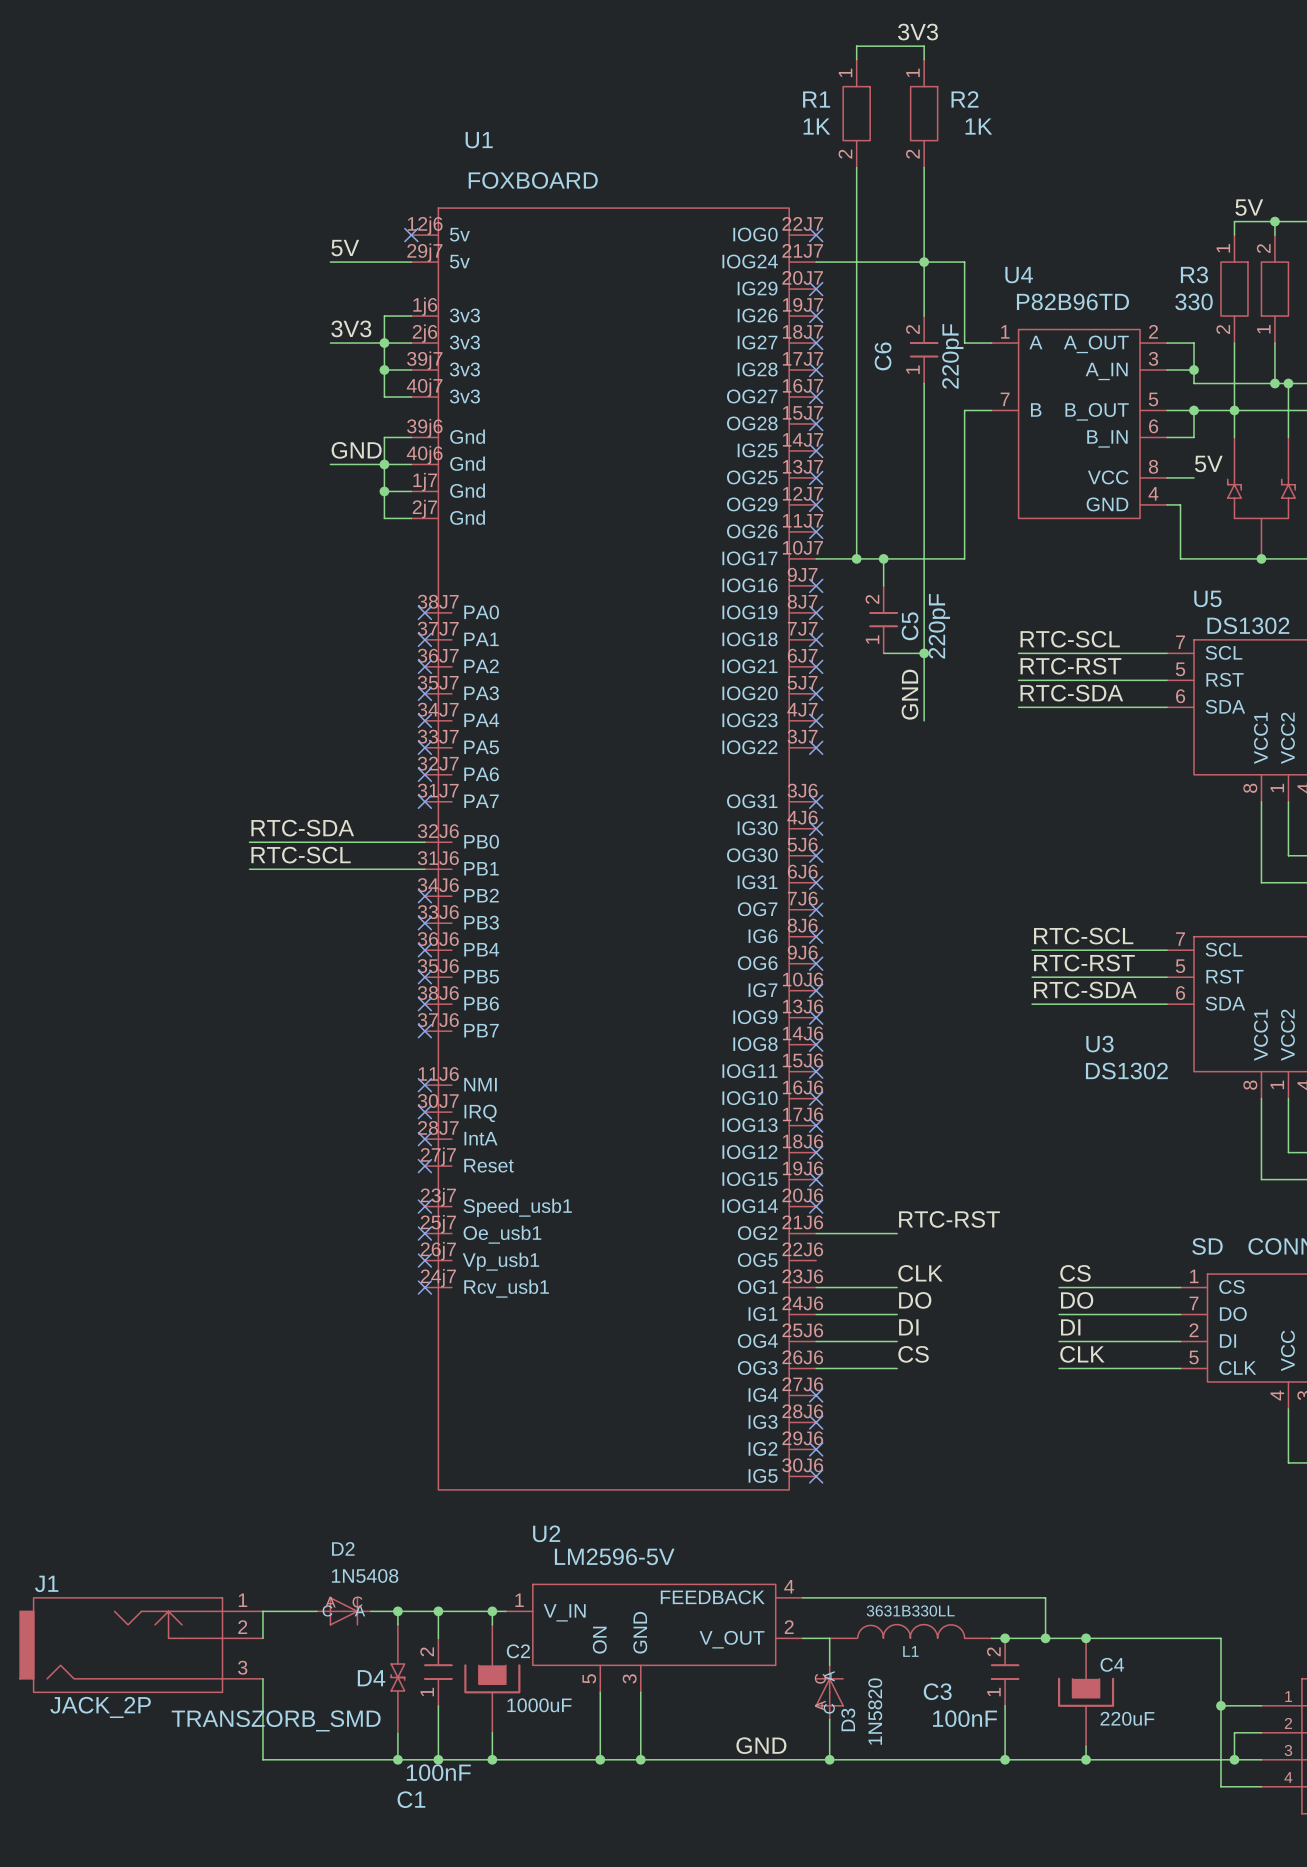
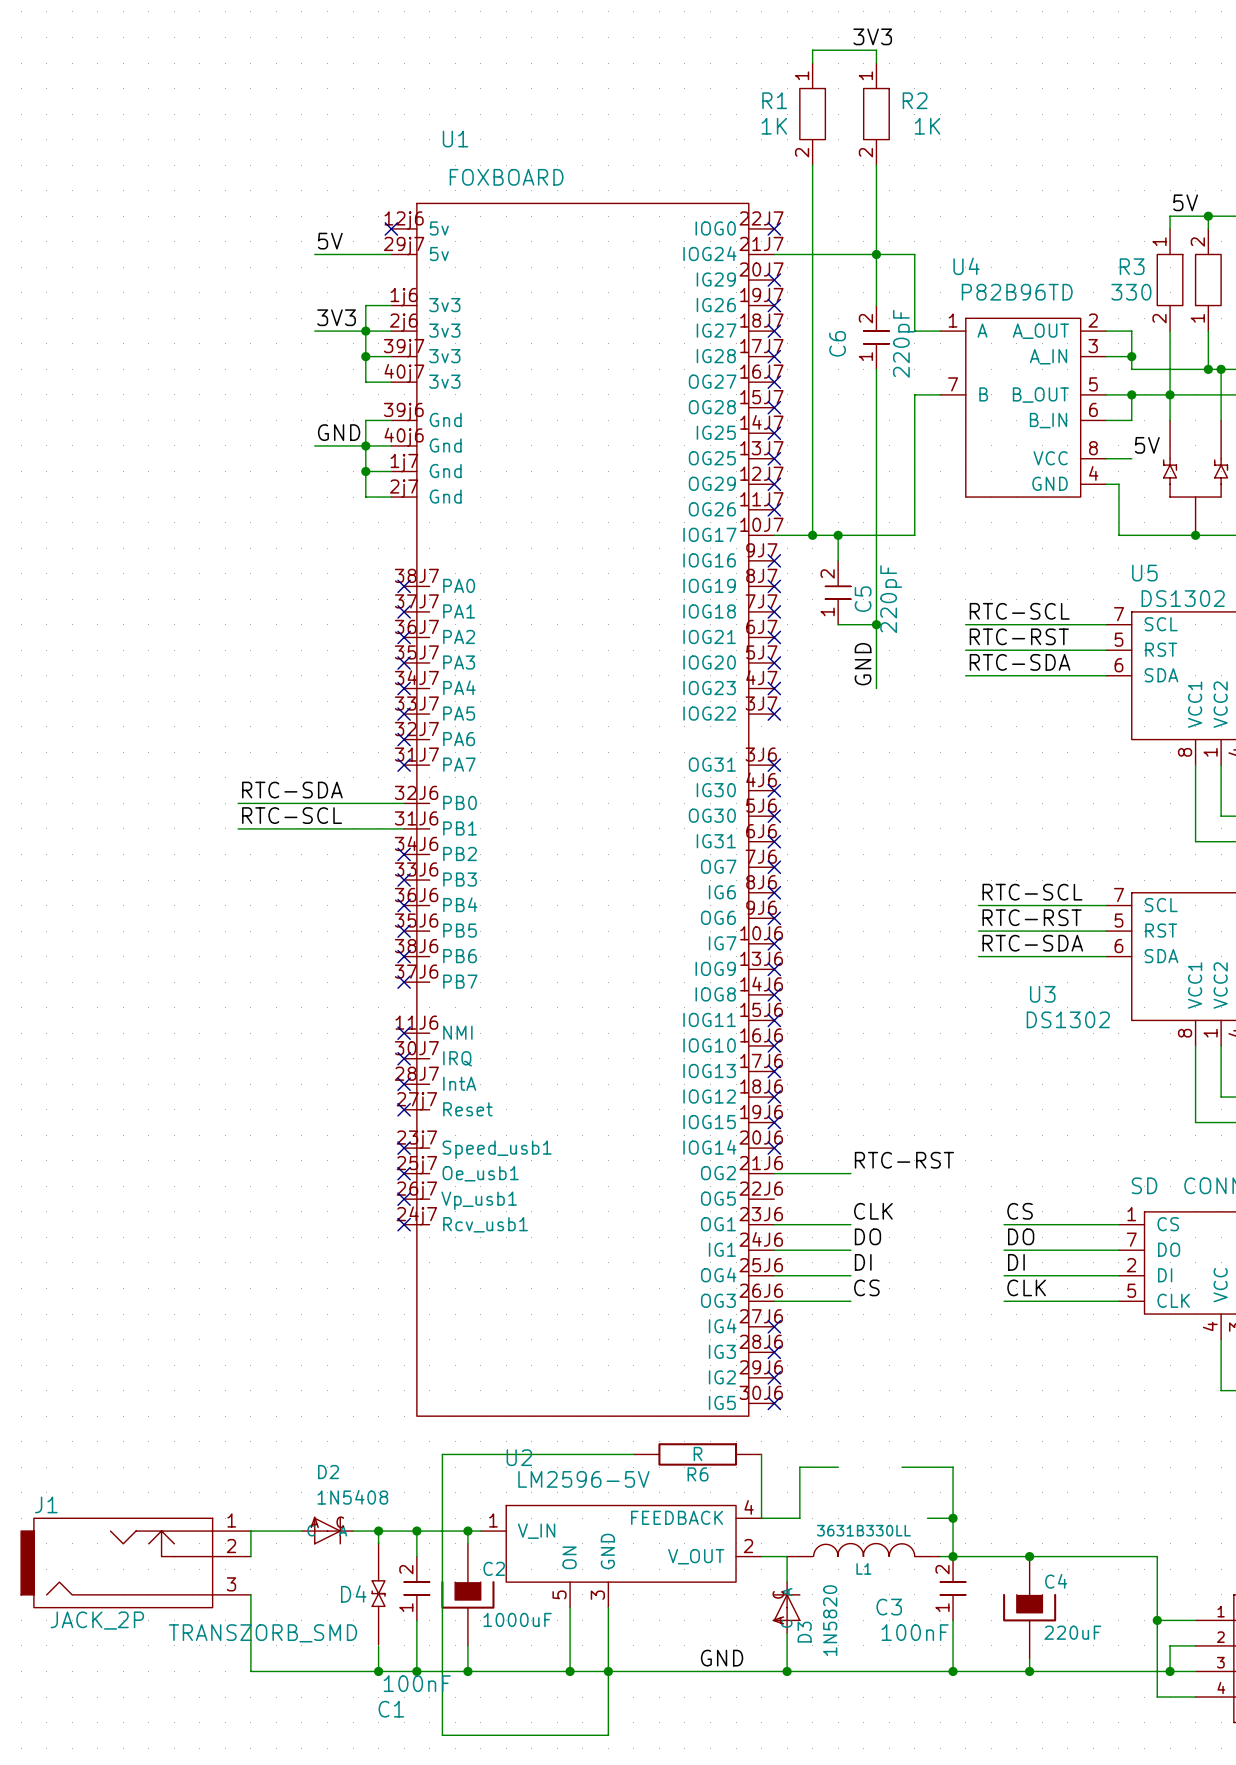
wire: none -> (633, 1454) (442, 1454) (442, 1735) (608, 1735) (608, 1671)
R6: none -> R (697, 1454)
wire: none -> (761, 1454) (761, 1518)
wire: none -> (901, 1467) (953, 1467) (953, 1556)
wire: (843, 1597) (978, 1597) -> (799, 1518) (799, 1467) (838, 1467)
wire: (1005, 1597) (1045, 1597) (1045, 1638) -> none
junction position: (1045, 1638) -> (953, 1518)

